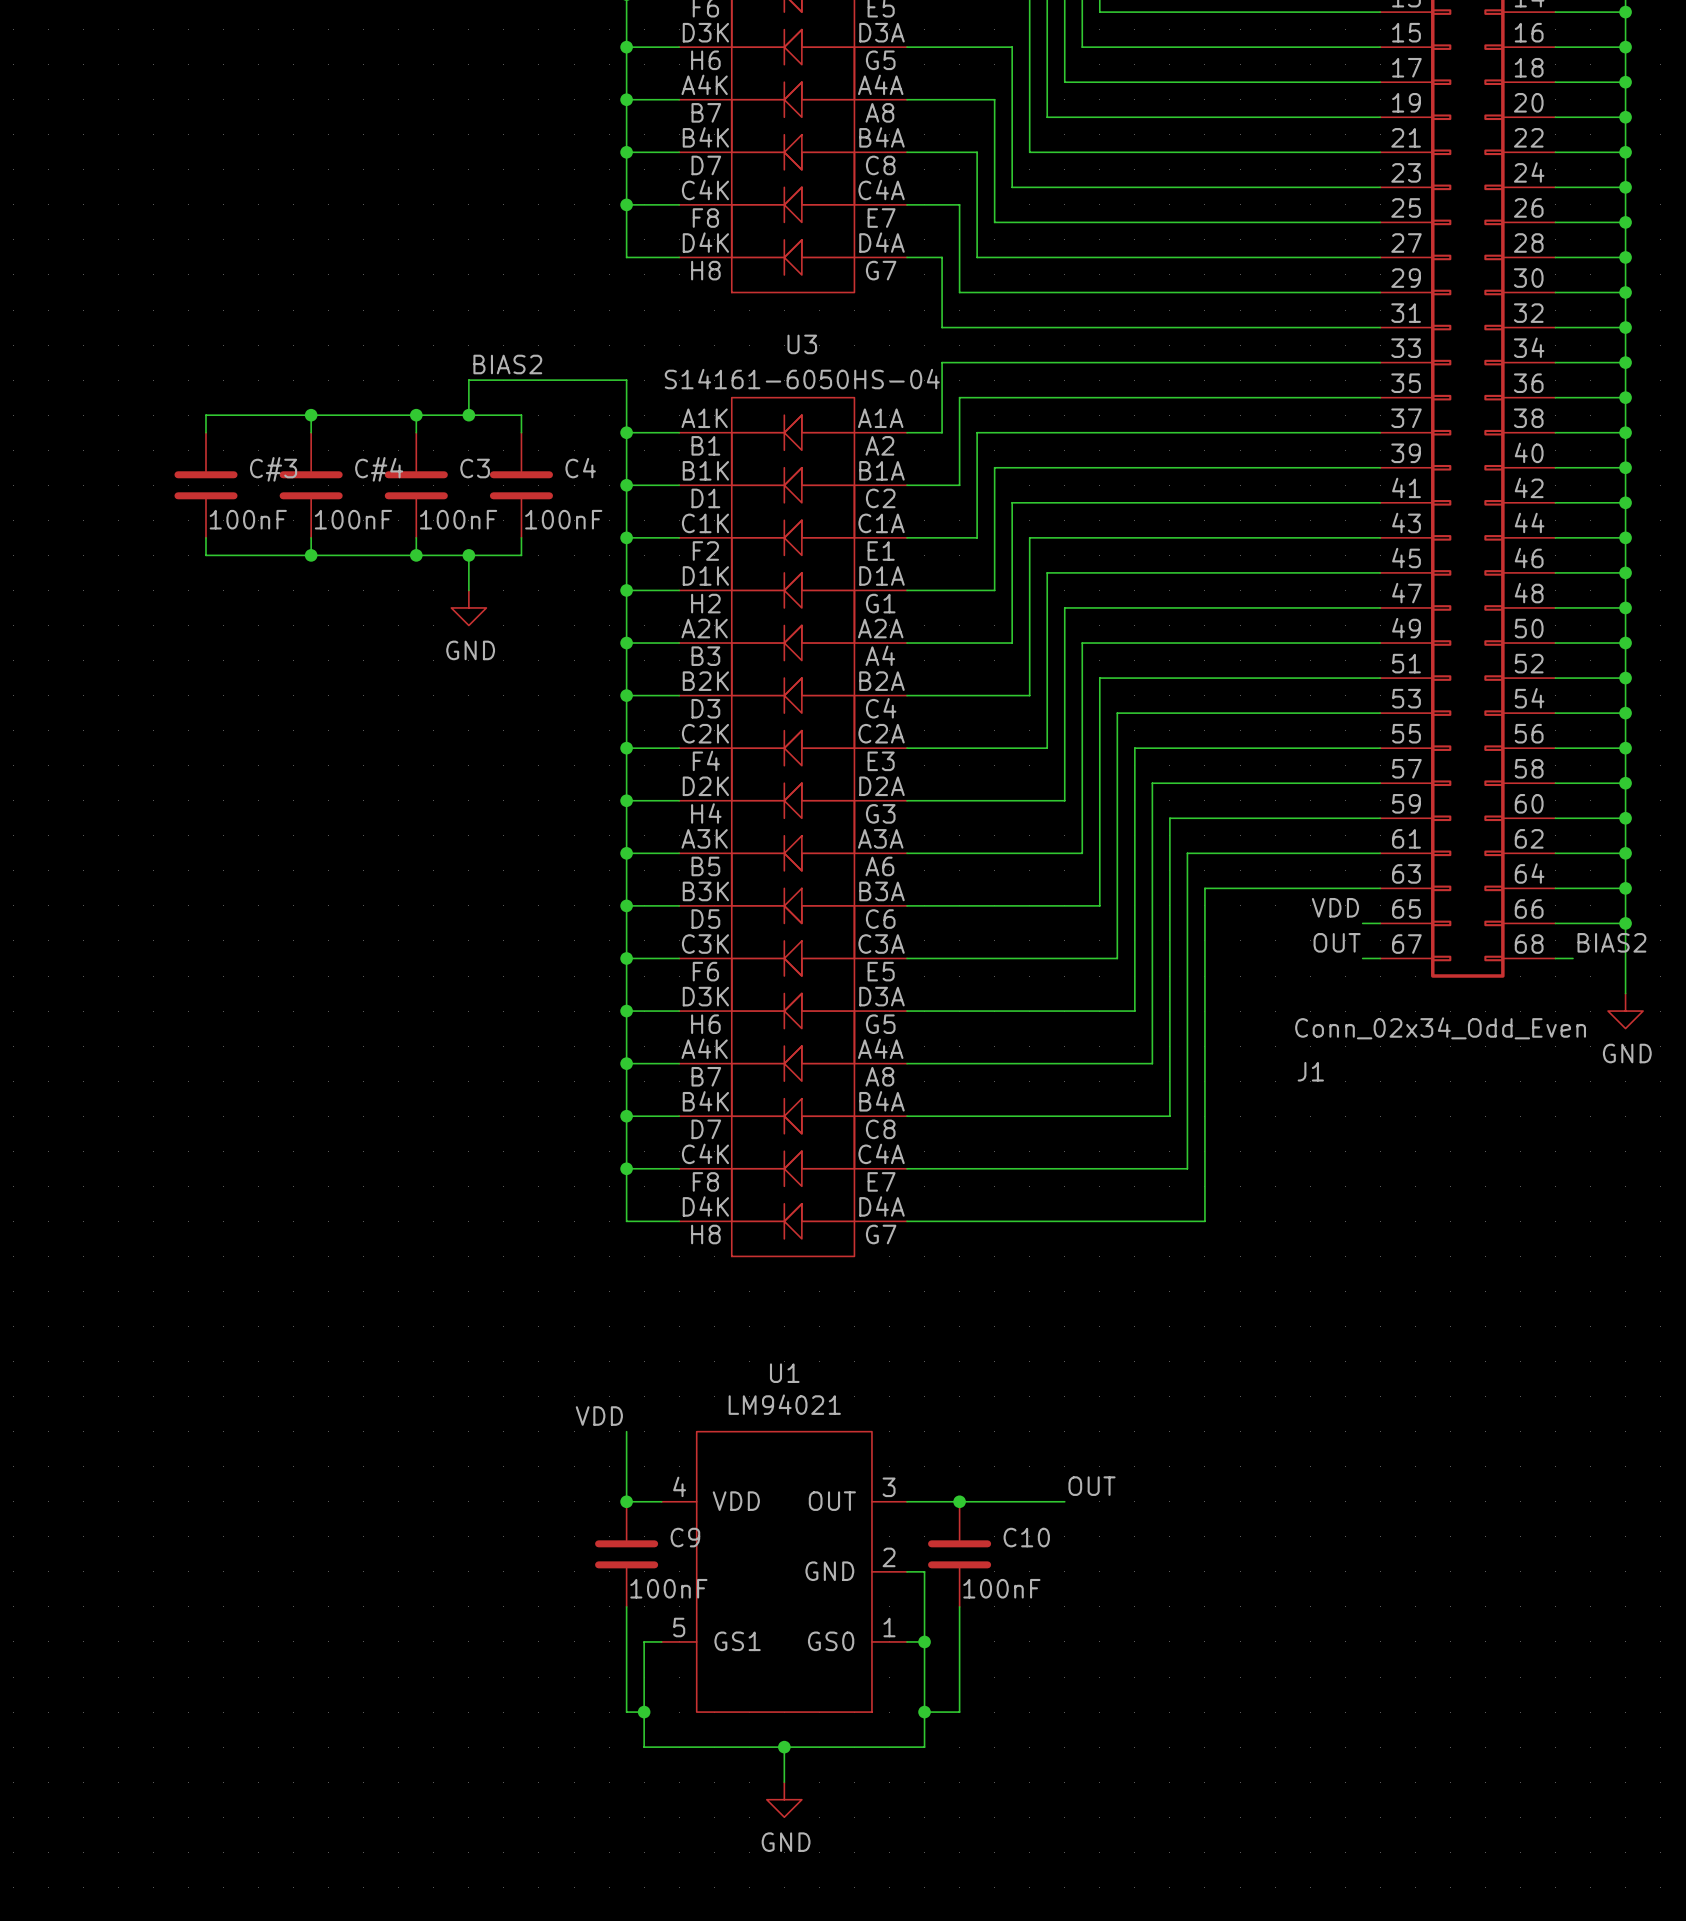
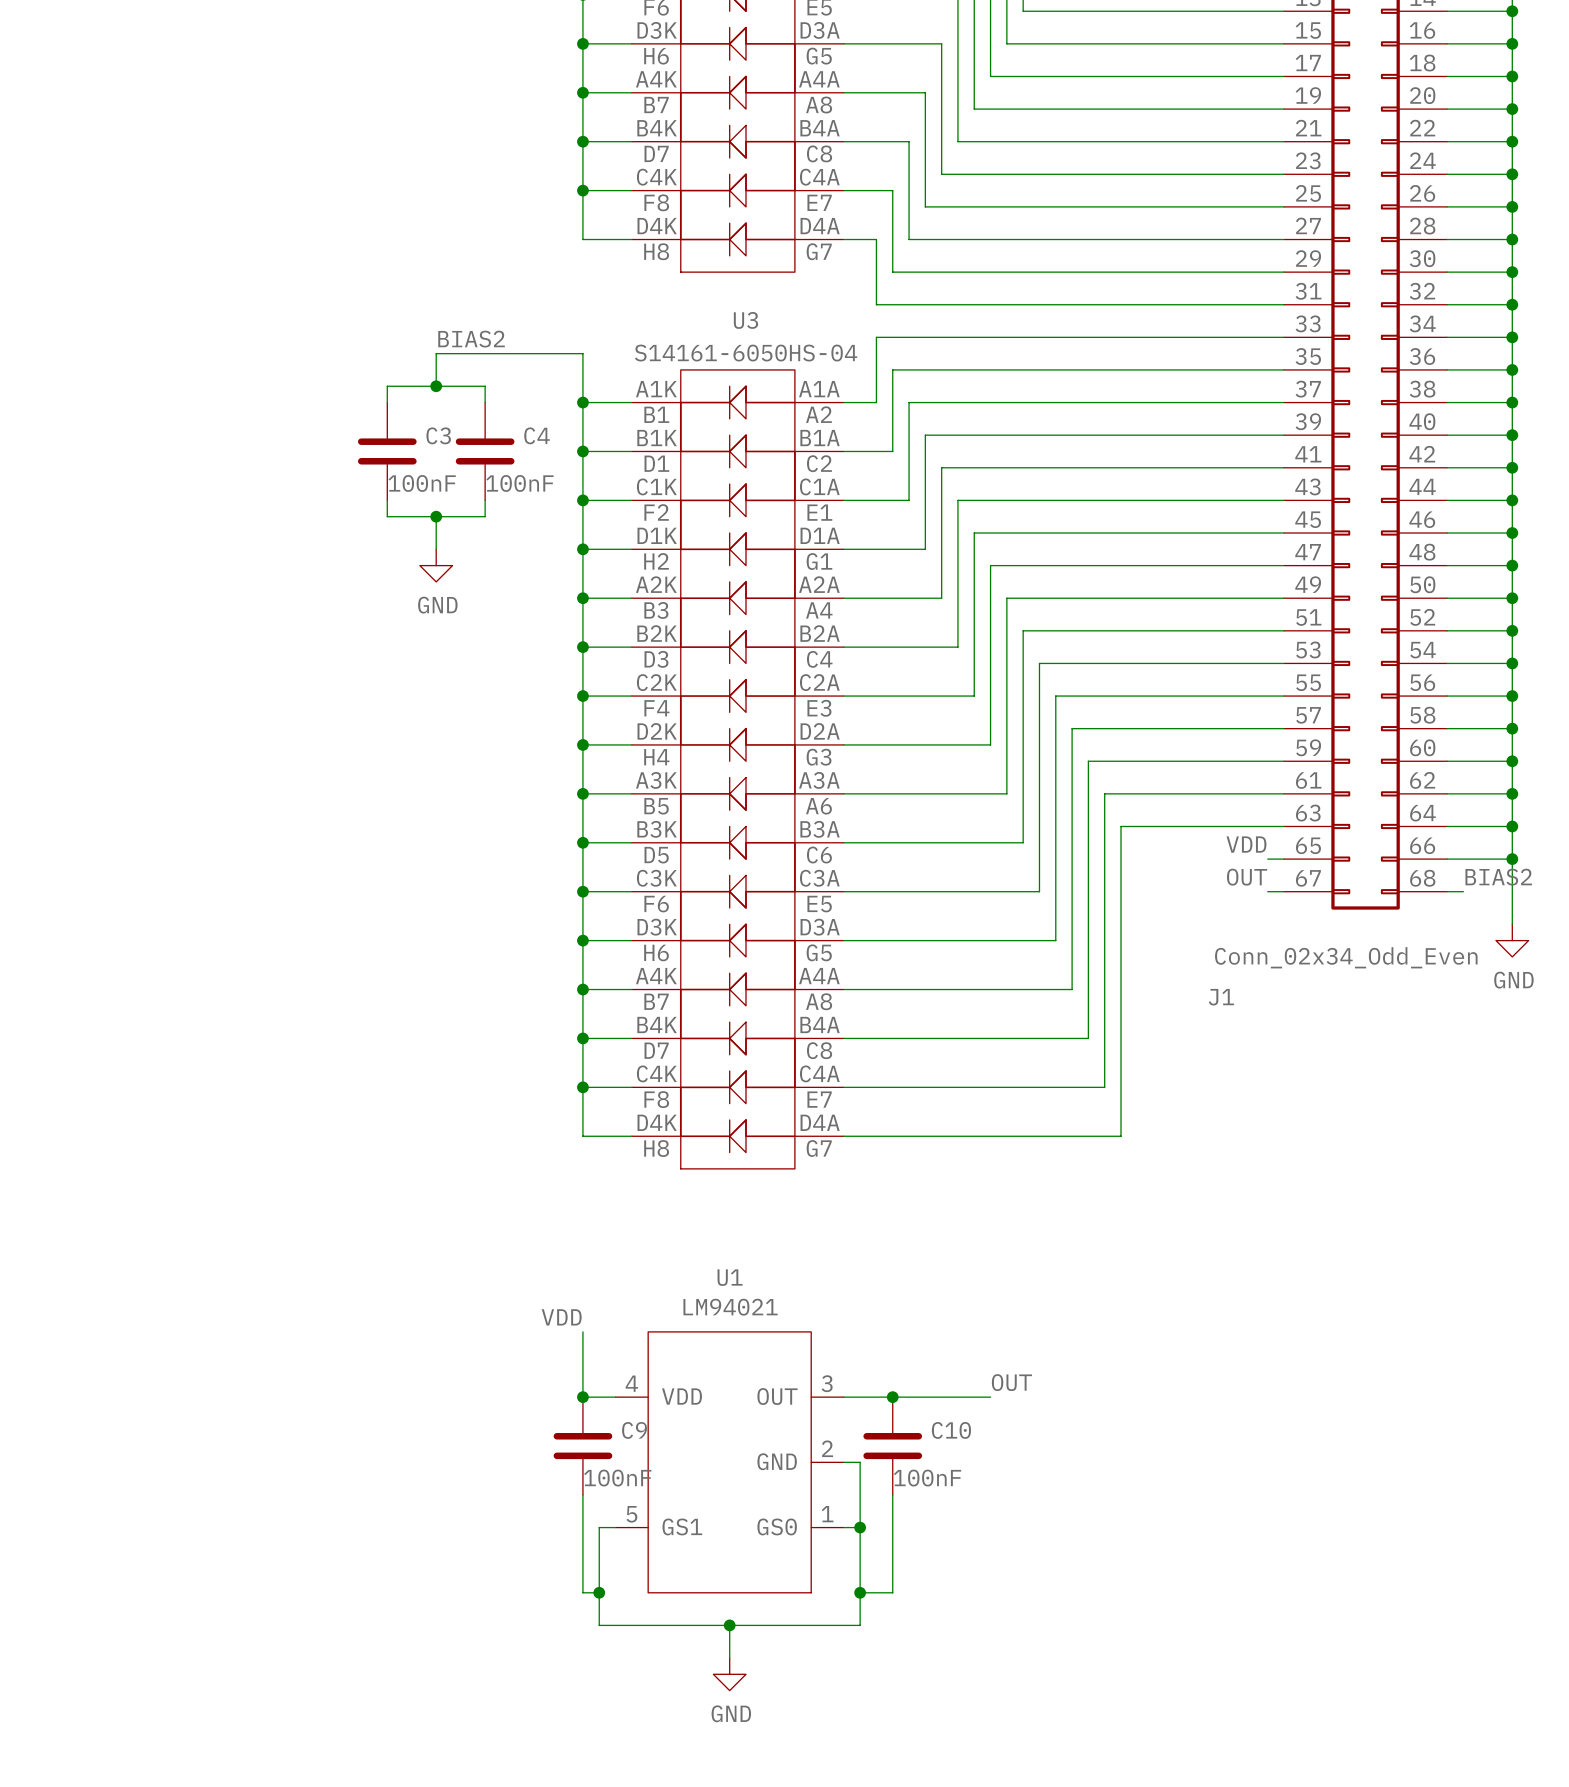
wire: (311, 415) (311, 432) -> none
junction: (311, 415) -> none
wire: (416, 415) (205, 415) (205, 432) -> none
junction: (416, 415) -> none
C#3: 100nF (205, 485) -> none
C#4: 100nF (311, 485) -> none
wire: (205, 537) (205, 555) (416, 555) -> none
wire: (311, 537) (311, 555) -> none
junction: (311, 555) -> none
junction: (416, 555) -> none

